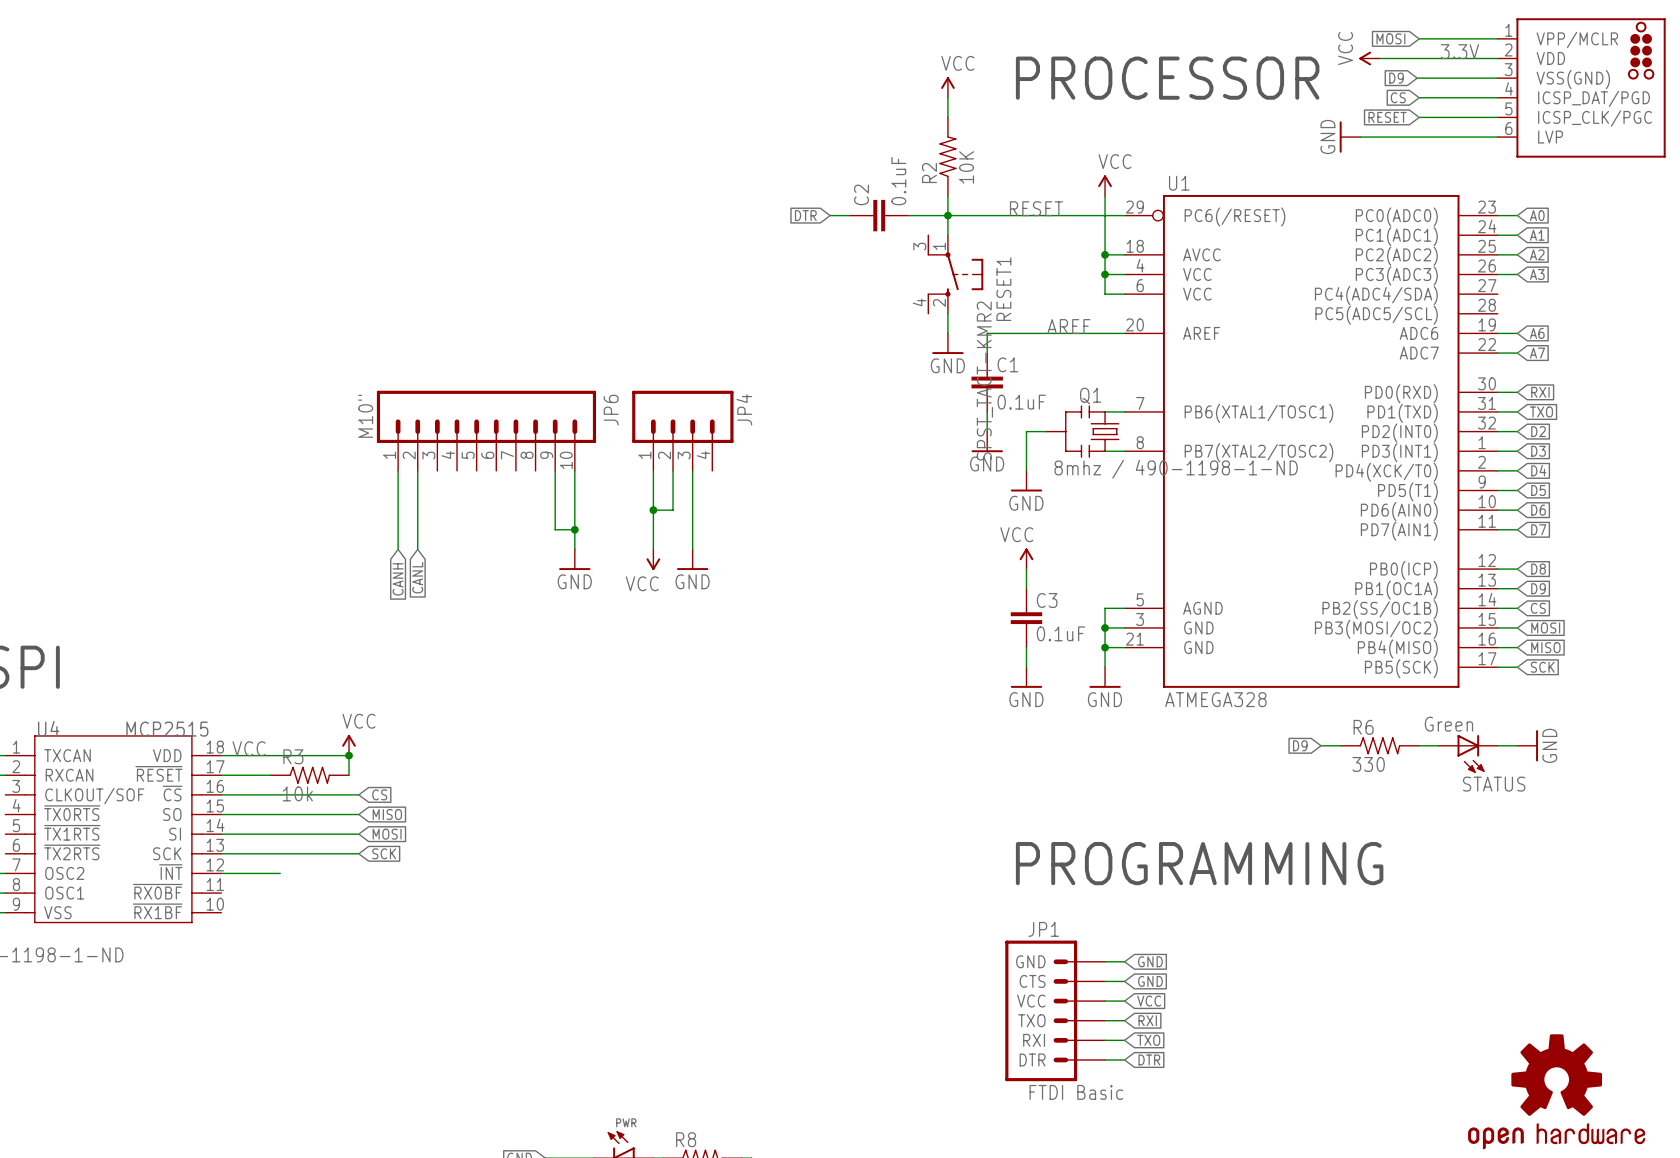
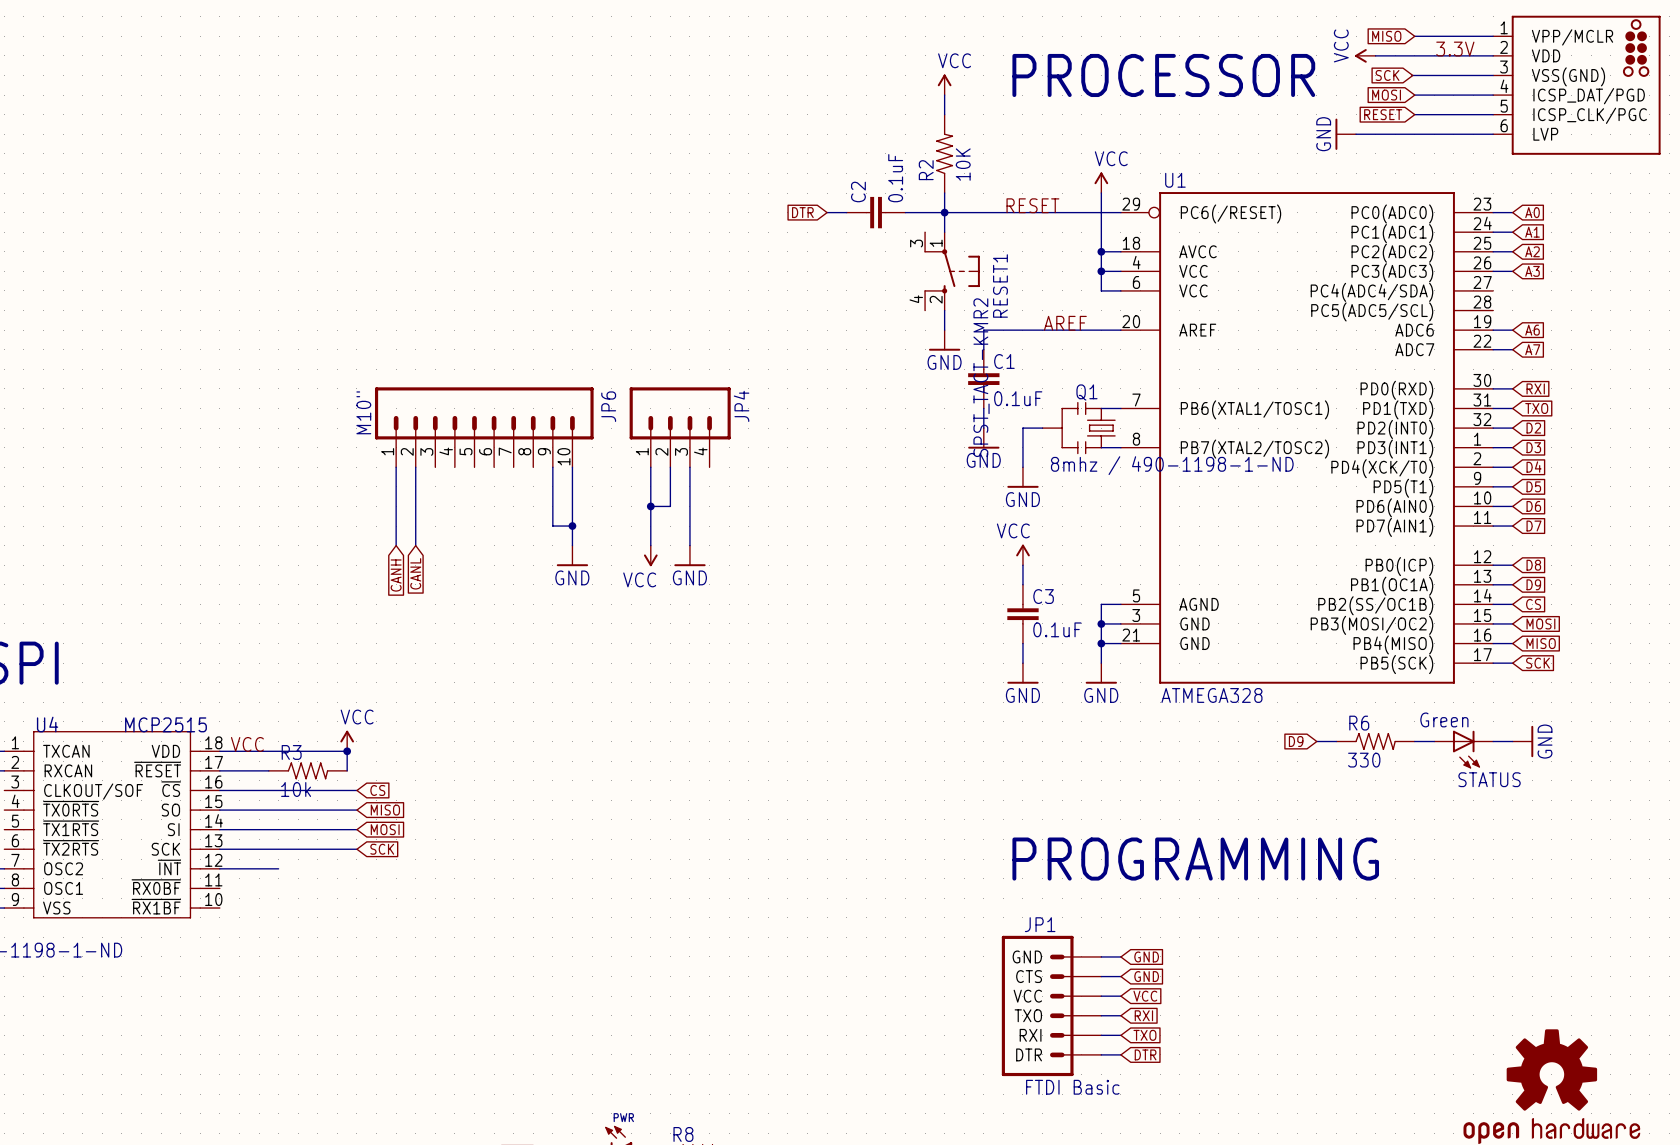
global label: MOSI (1390, 38) -> MISO (1386, 36)
global label: D9 (1396, 78) -> SCK (1387, 75)
global label: CS (1398, 97) -> MOSI (1386, 95)

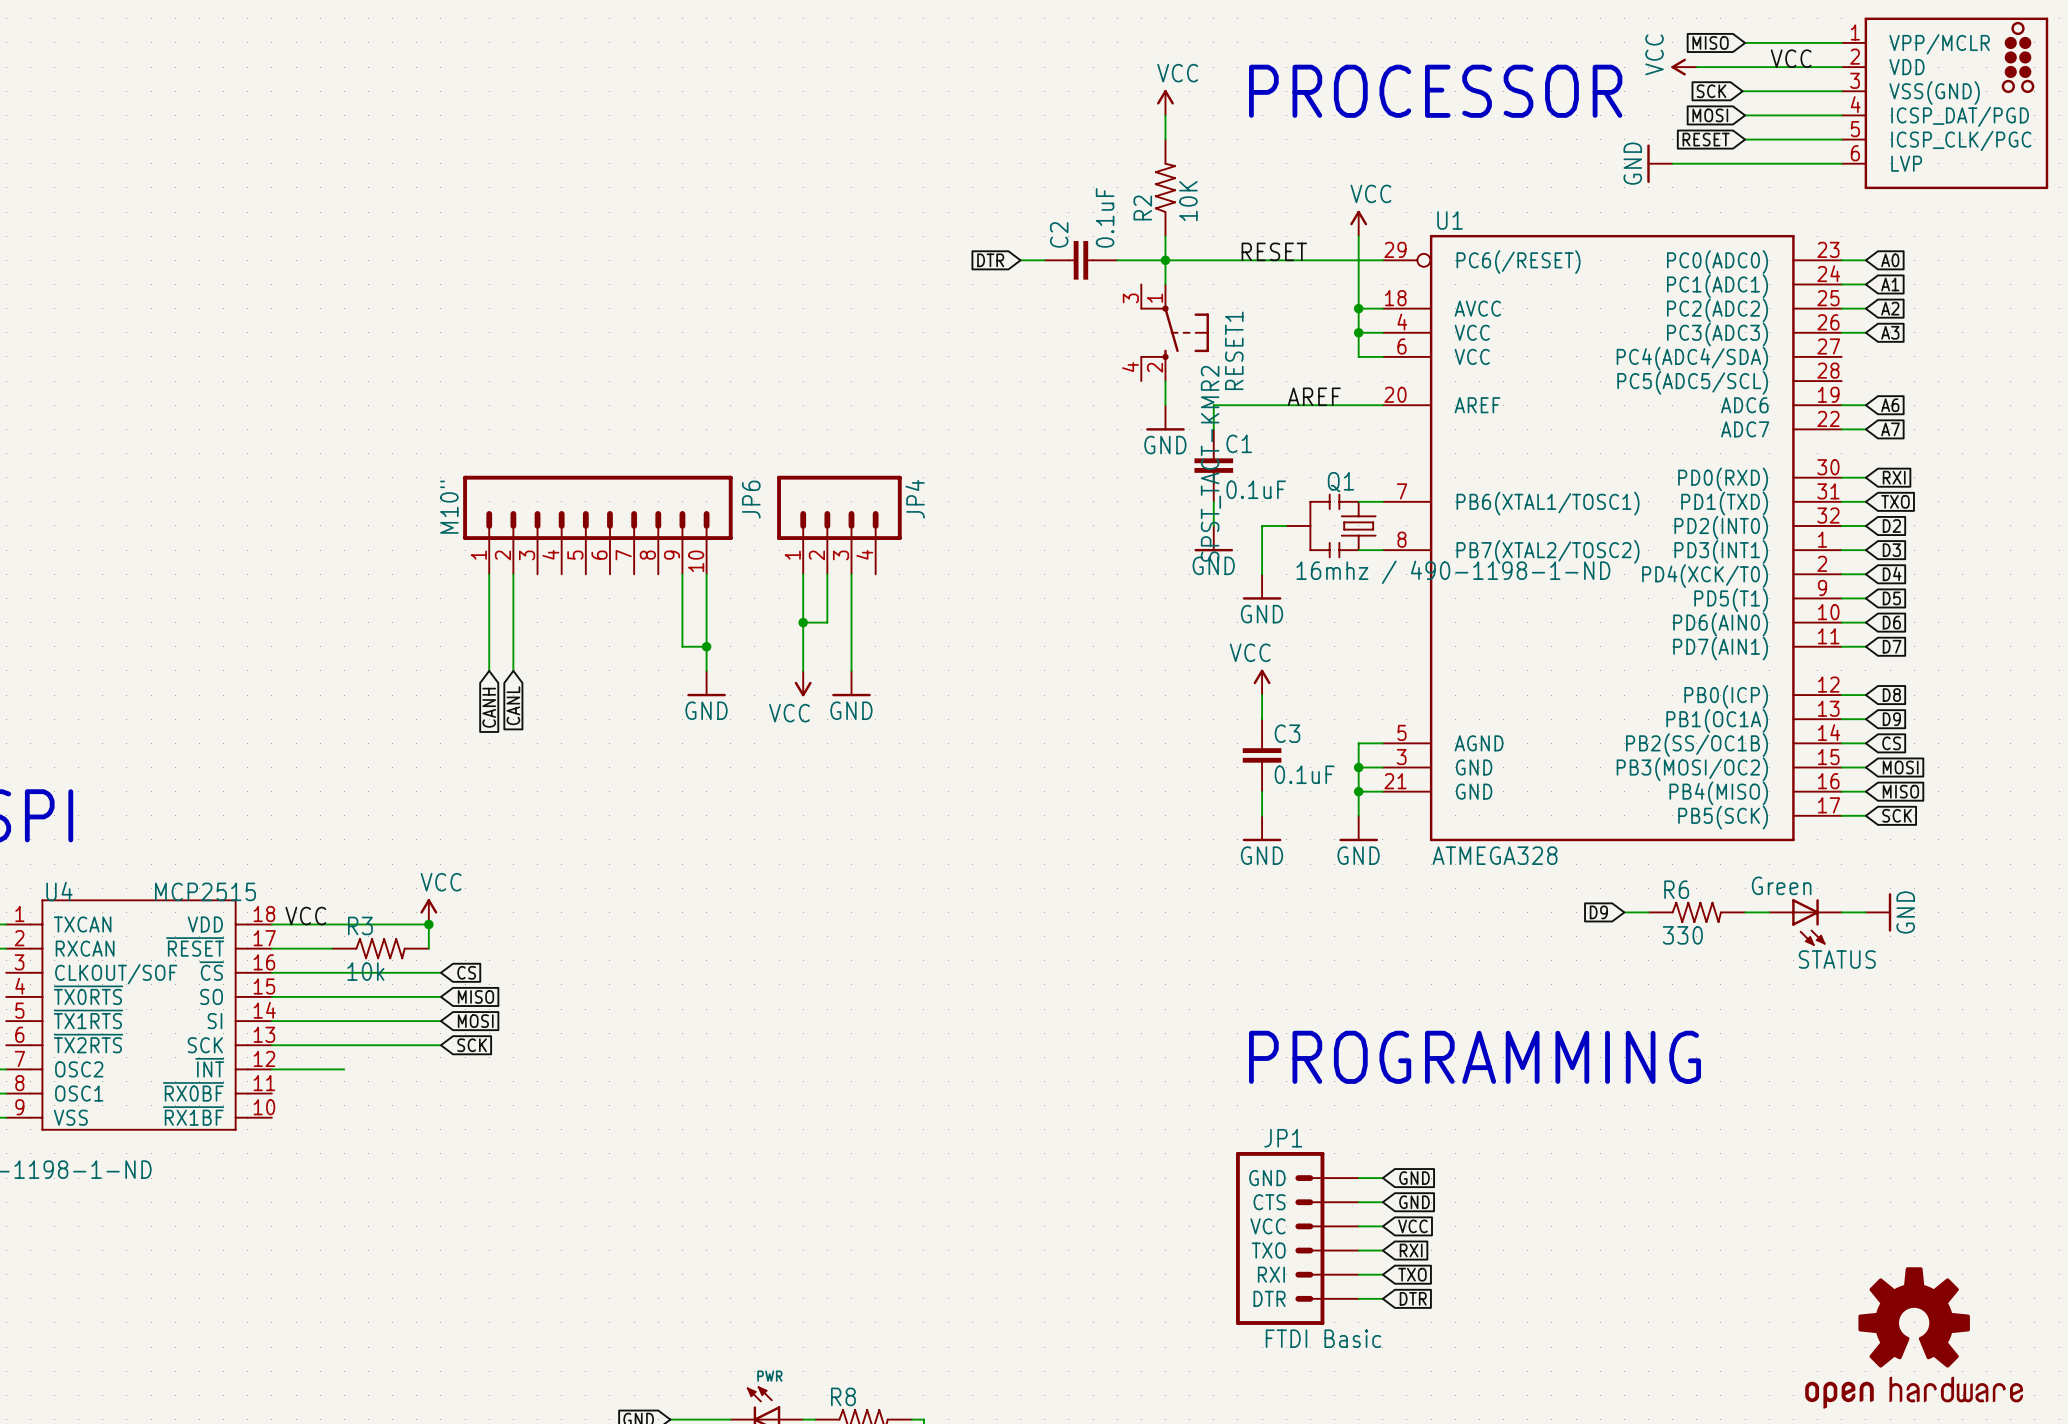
label: 3.3V (1455, 49) -> VCC (1791, 58)
Q1 value: 8mhz / 490-1198-1-ND (1172, 465) -> 16mhz / 490-1198-1-ND (1453, 572)

